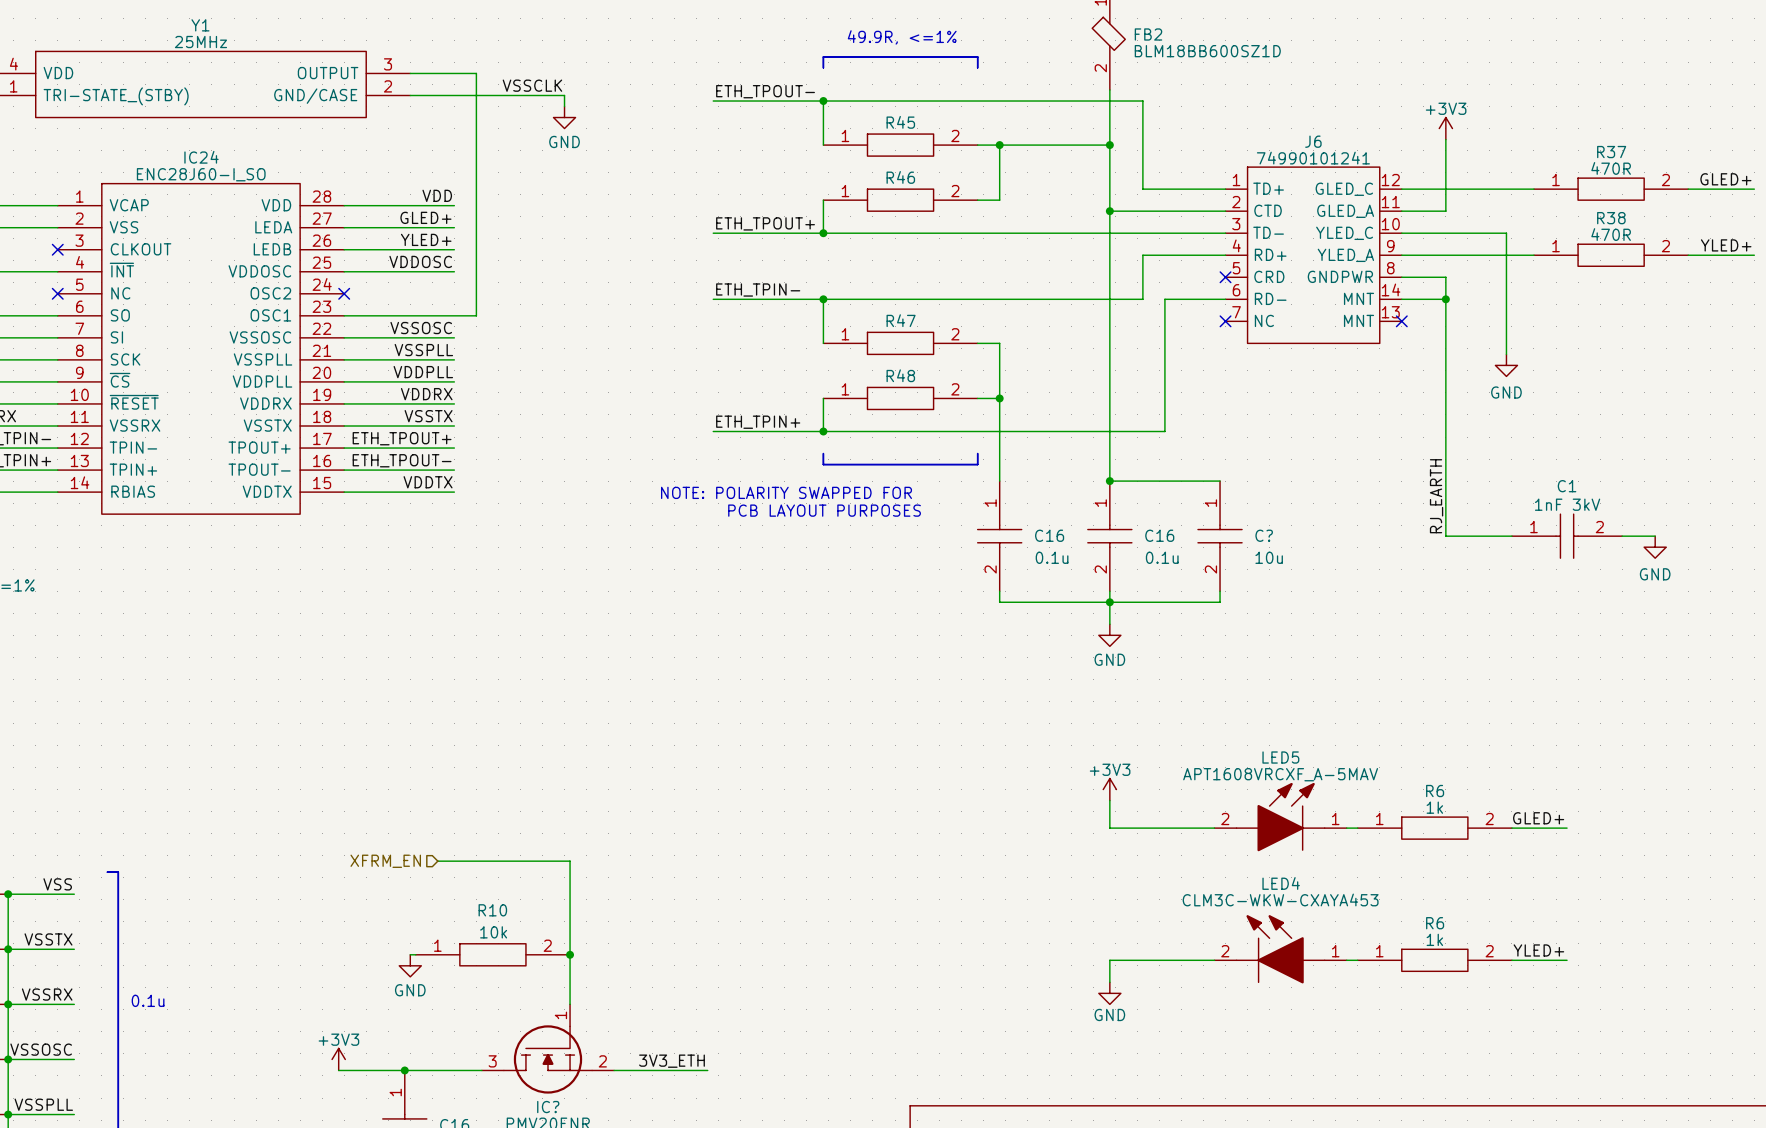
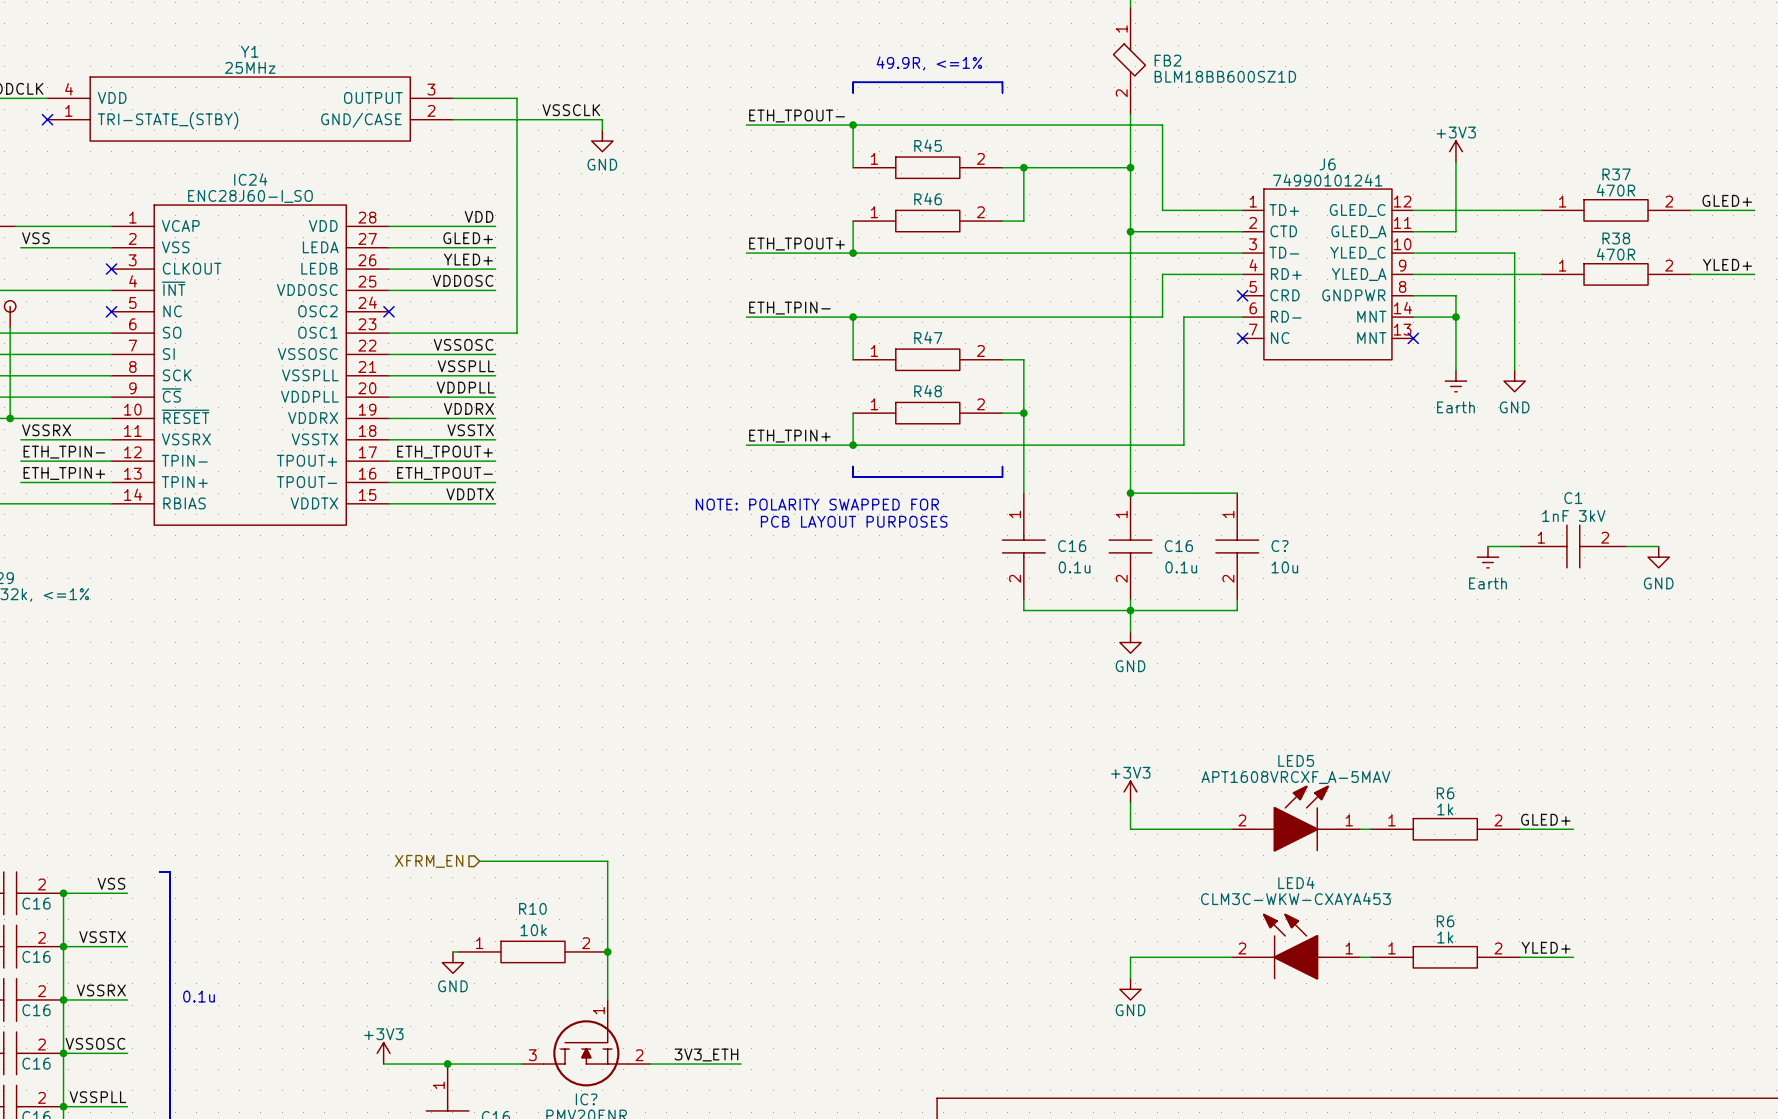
wire: (1445, 354) (1445, 536) (1478, 536) -> none
power symbol: none -> Earth (1455, 381)
label: RJ_EARTH (1436, 496) -> none
power symbol: none -> Earth (1487, 557)

